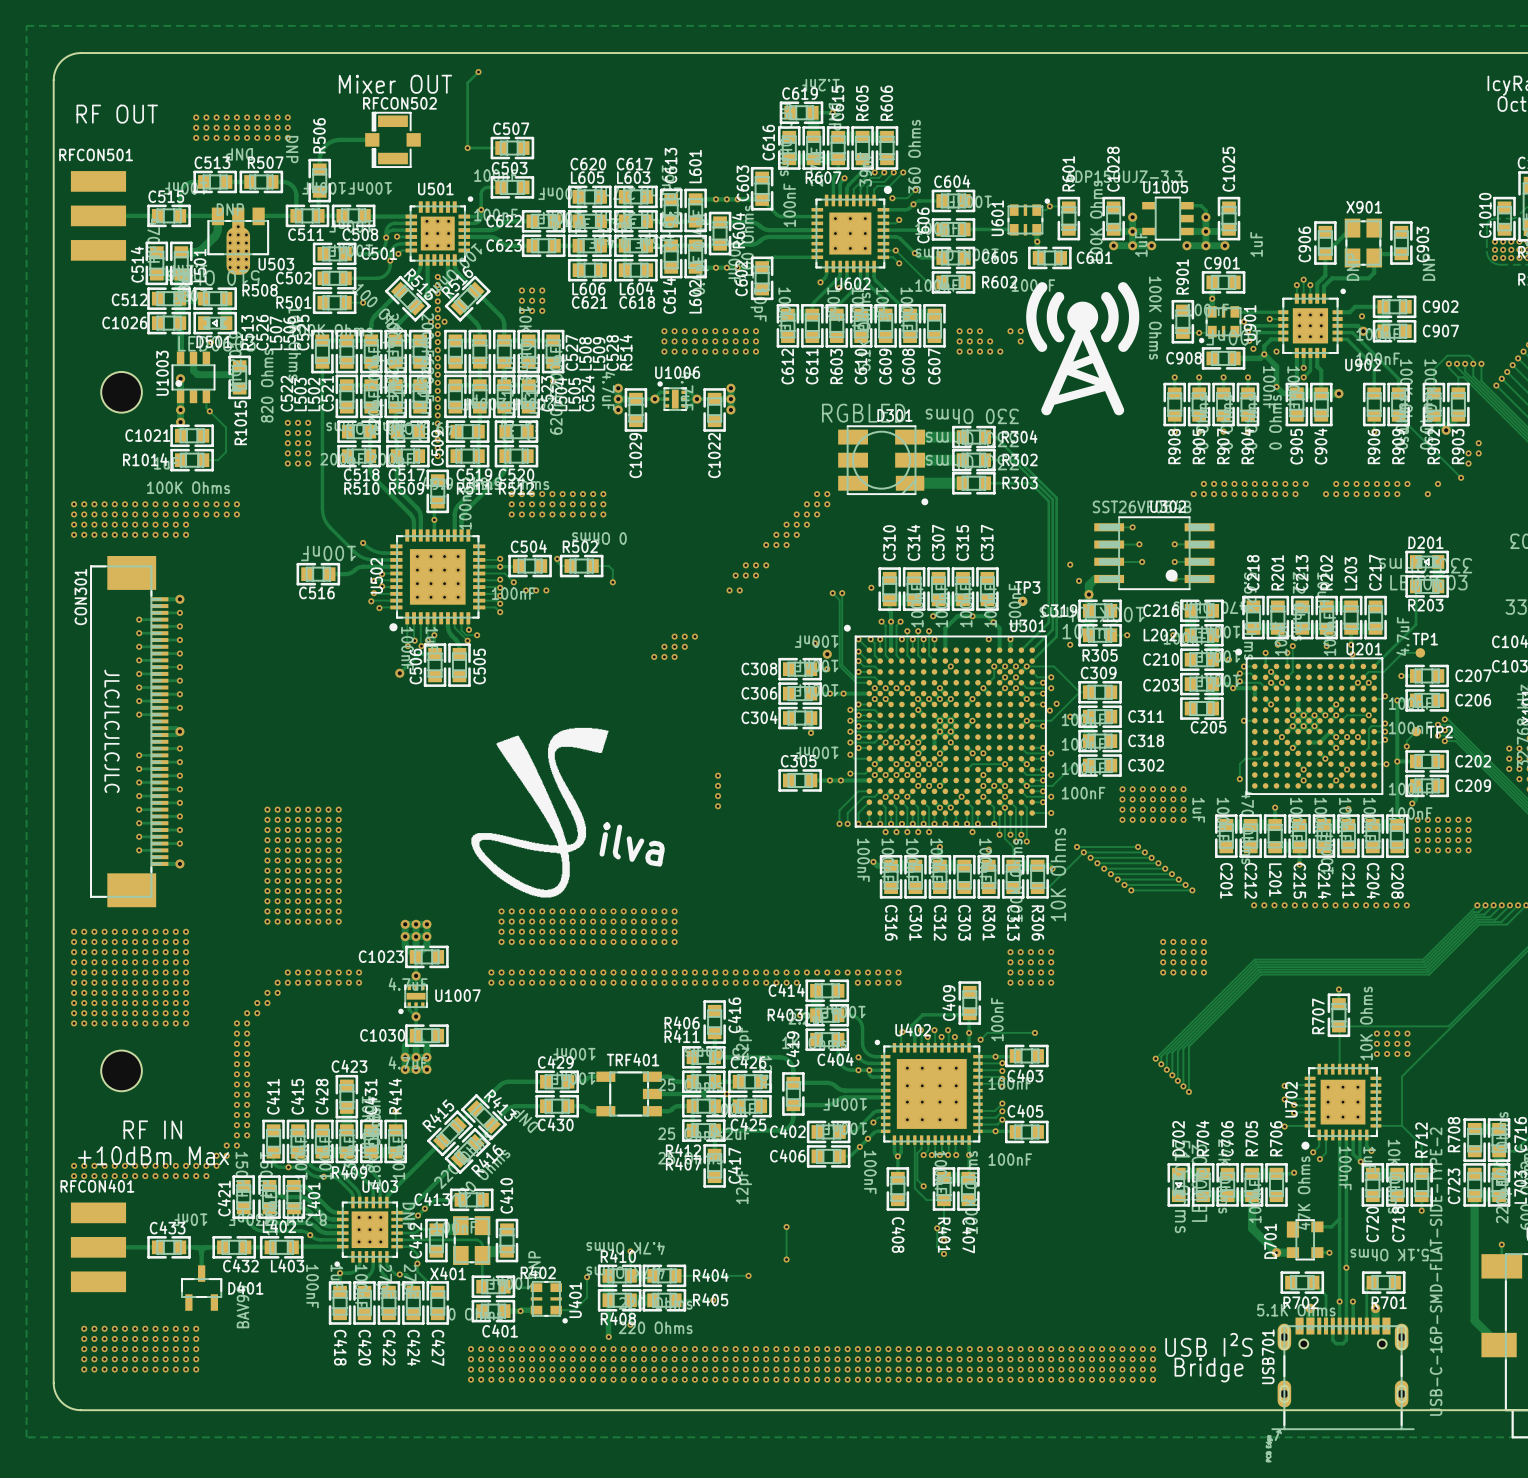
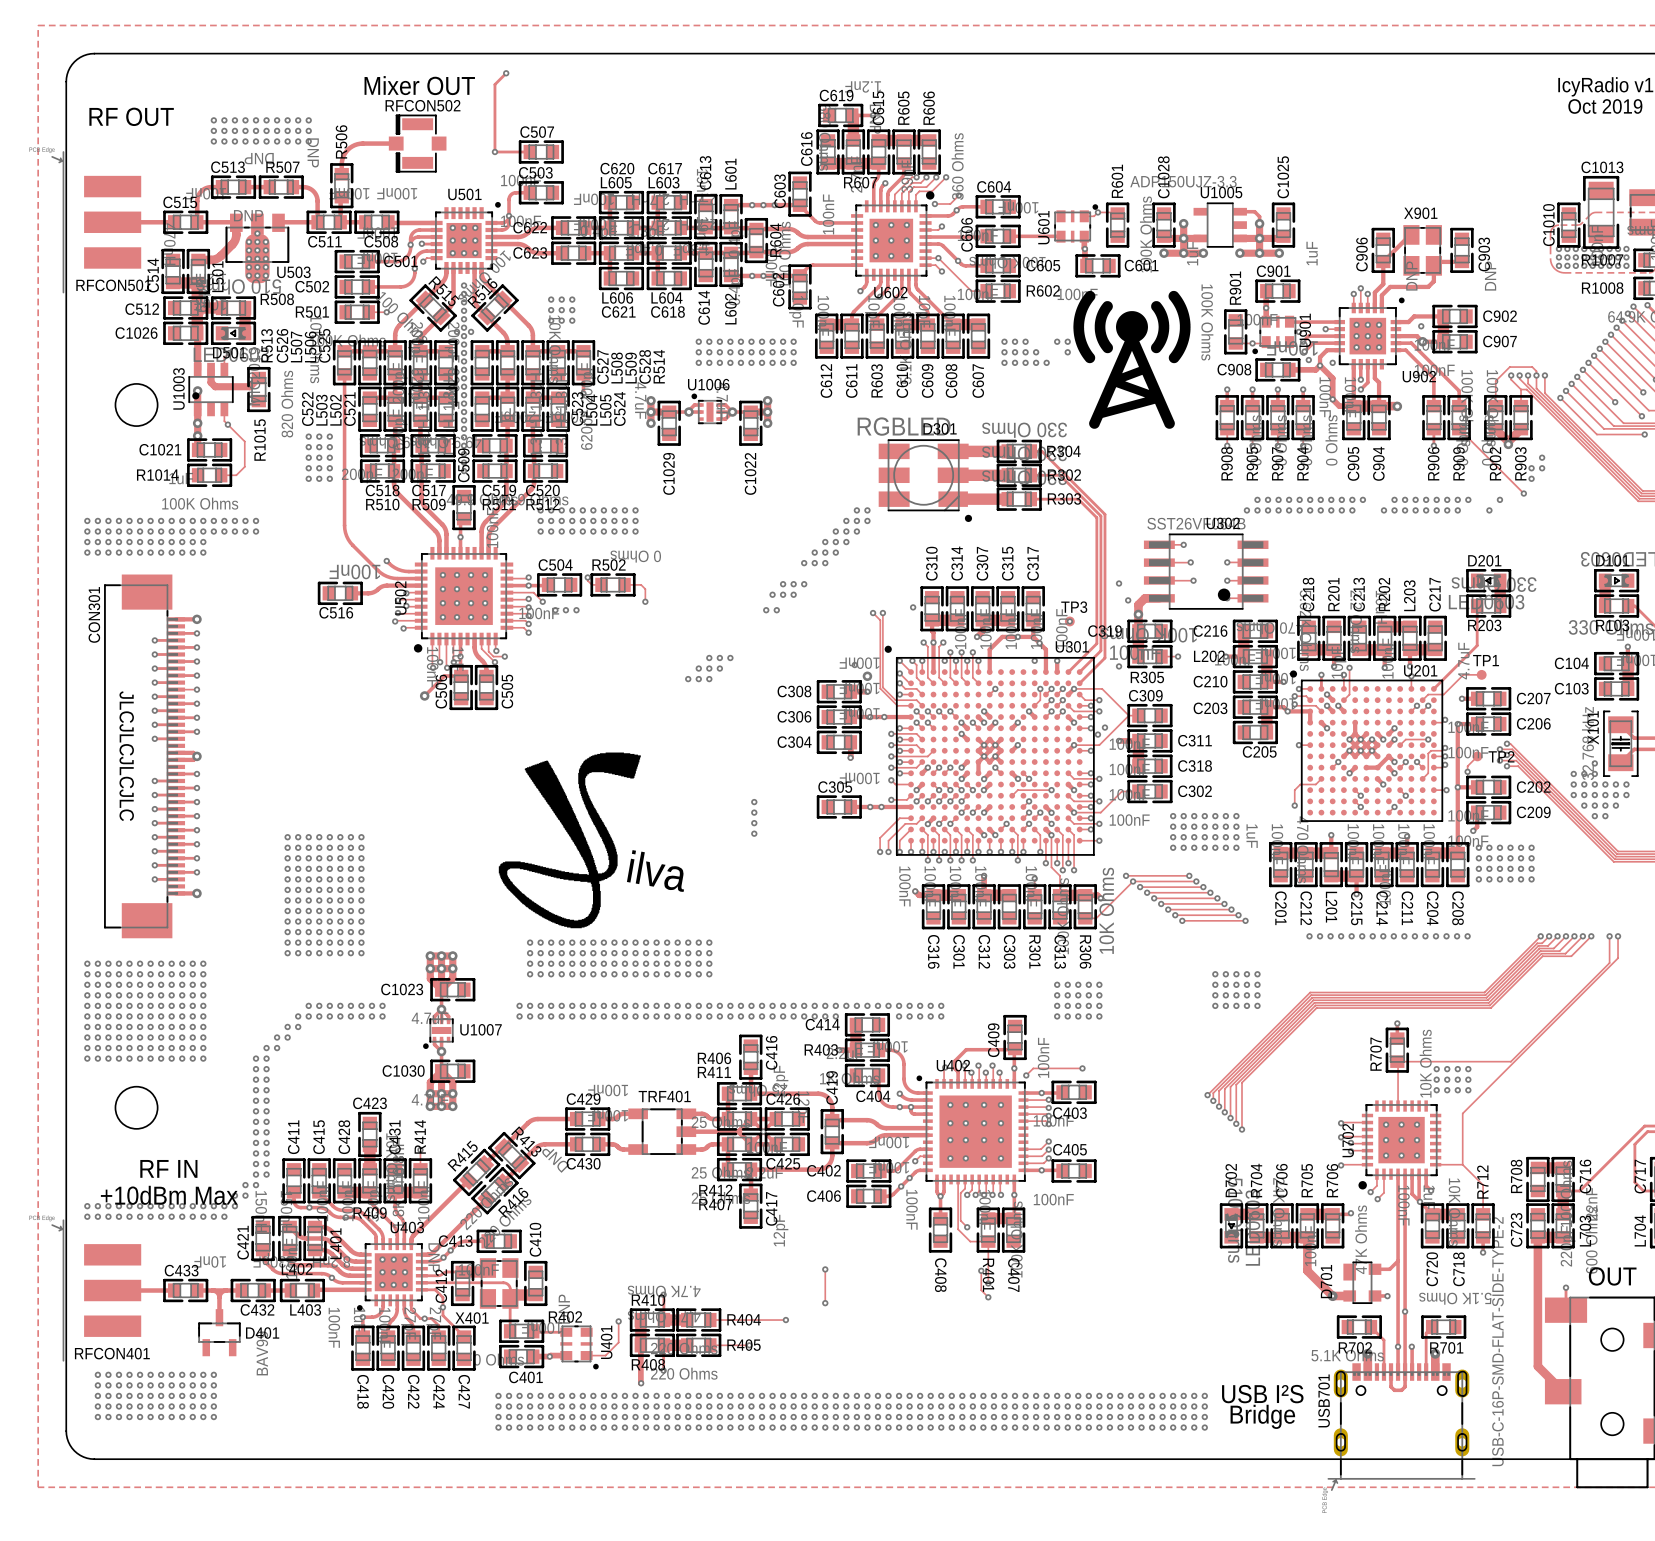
RFCON501 name position: RFCON501 (96, 154) -> RFCON501 (113, 285)
RFCON501 footprint: [70, 171, 127, 261] -> [51, 151, 142, 293]
RFCON401 name position: RFCON401 (97, 1186) -> RFCON401 (112, 1353)
RFCON401 footprint: [70, 1202, 127, 1293] -> [51, 1220, 142, 1361]

